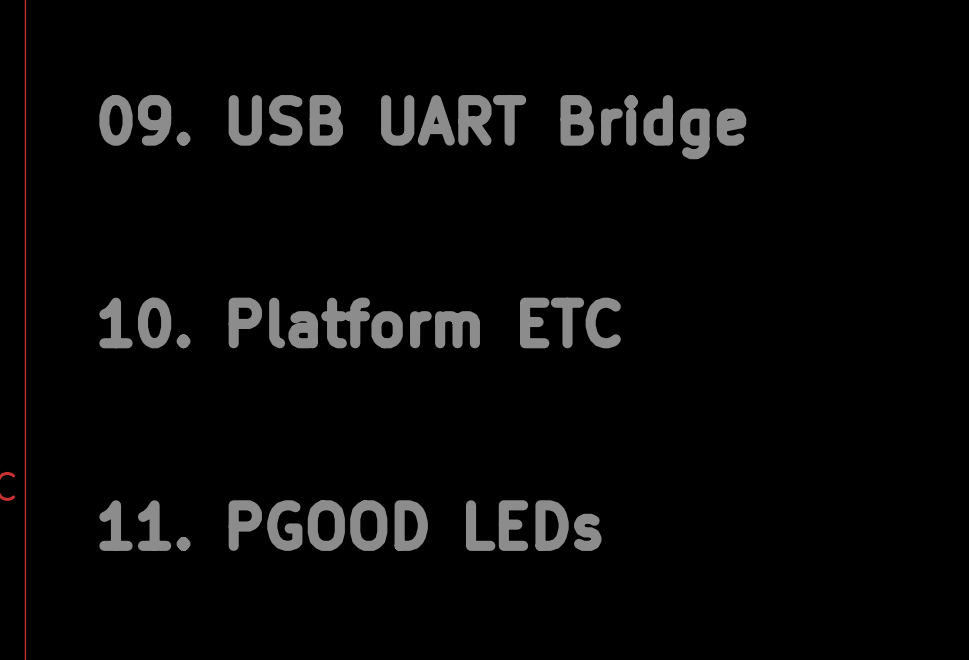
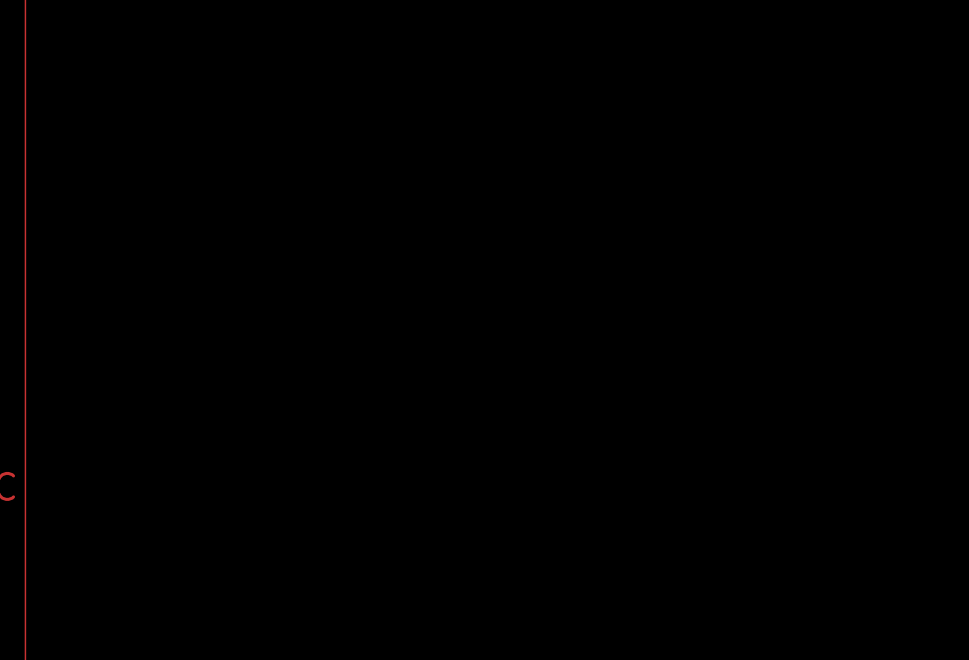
text: 09. USB UART Bridge (422, 127) -> none
text: 10. Platform ETC (360, 322) -> none
text: 11. PGOOD LEDs (350, 525) -> none

